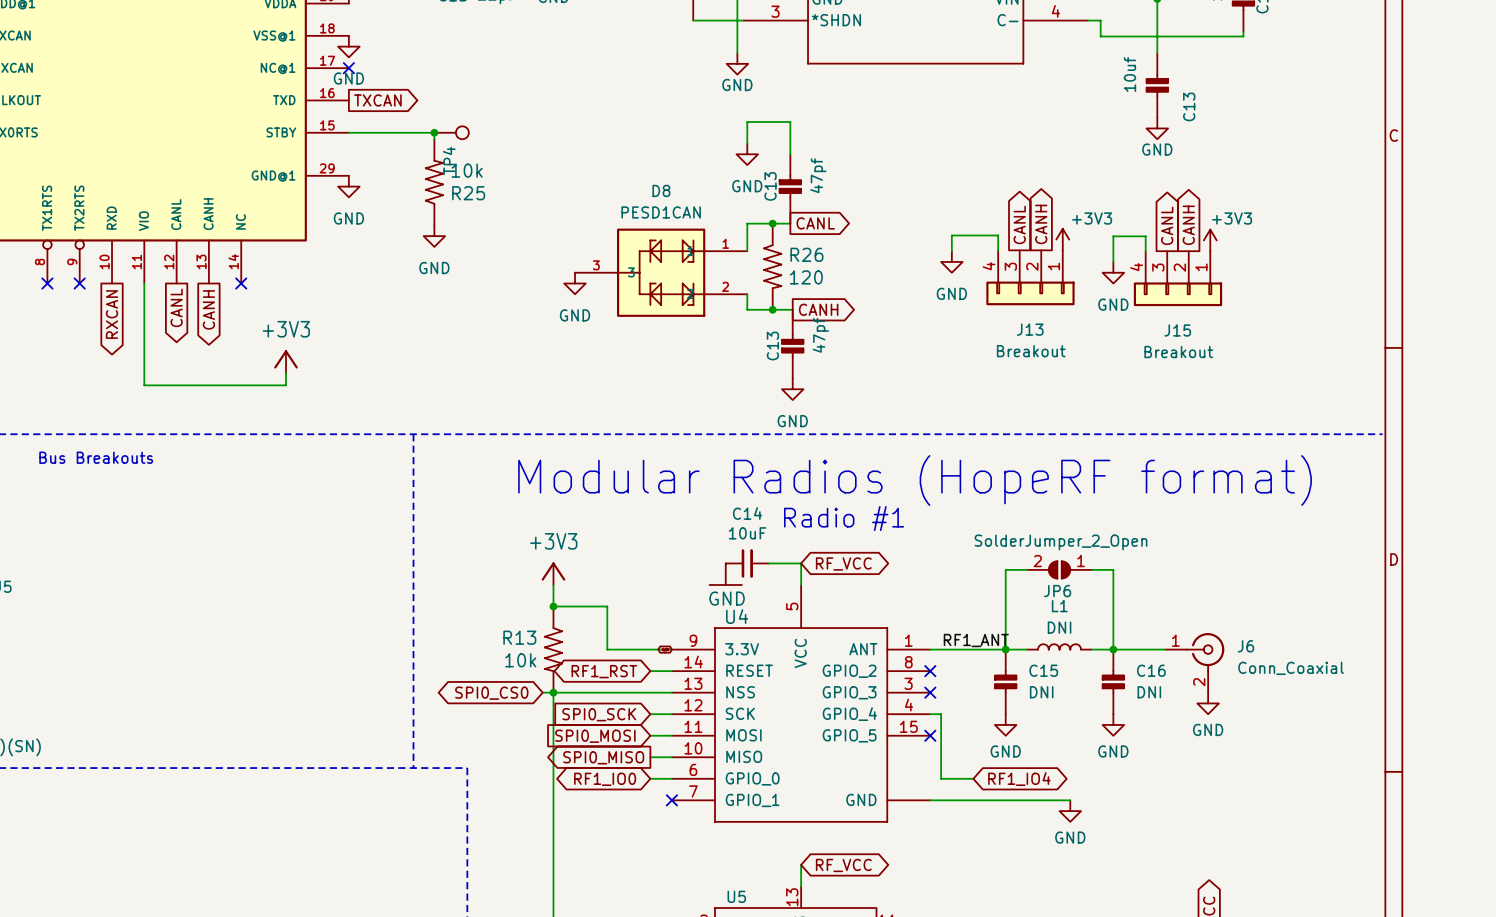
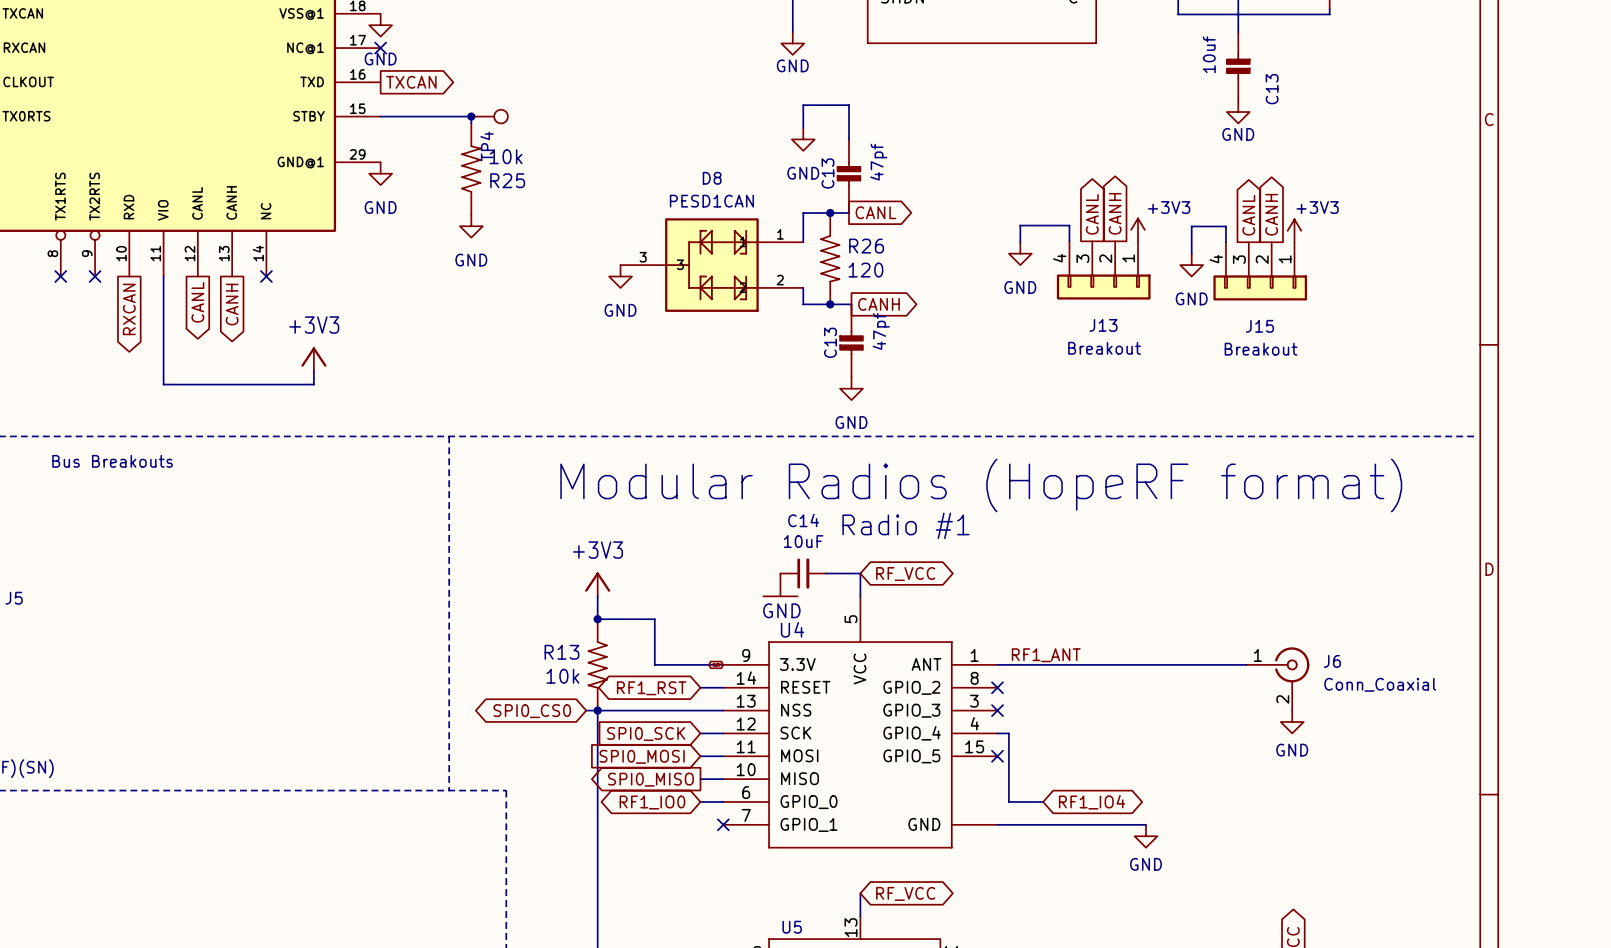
wire: (1027, 569) (1005, 569) (1005, 649) -> none
JP6: SolderJumper_2_Open (1059, 569) -> none
wire: (1091, 569) (1113, 569) (1113, 649) -> none
L1: DNI (1059, 646) -> none
junction: (1005, 649) -> none
wire: none -> (1100, 664) (1168, 664)
junction: (1113, 649) -> none
C15: DNI (1005, 681) -> none
C16: DNI (1113, 681) -> none
power symbol: GND (1005, 724) -> none
power symbol: GND (1113, 724) -> none

